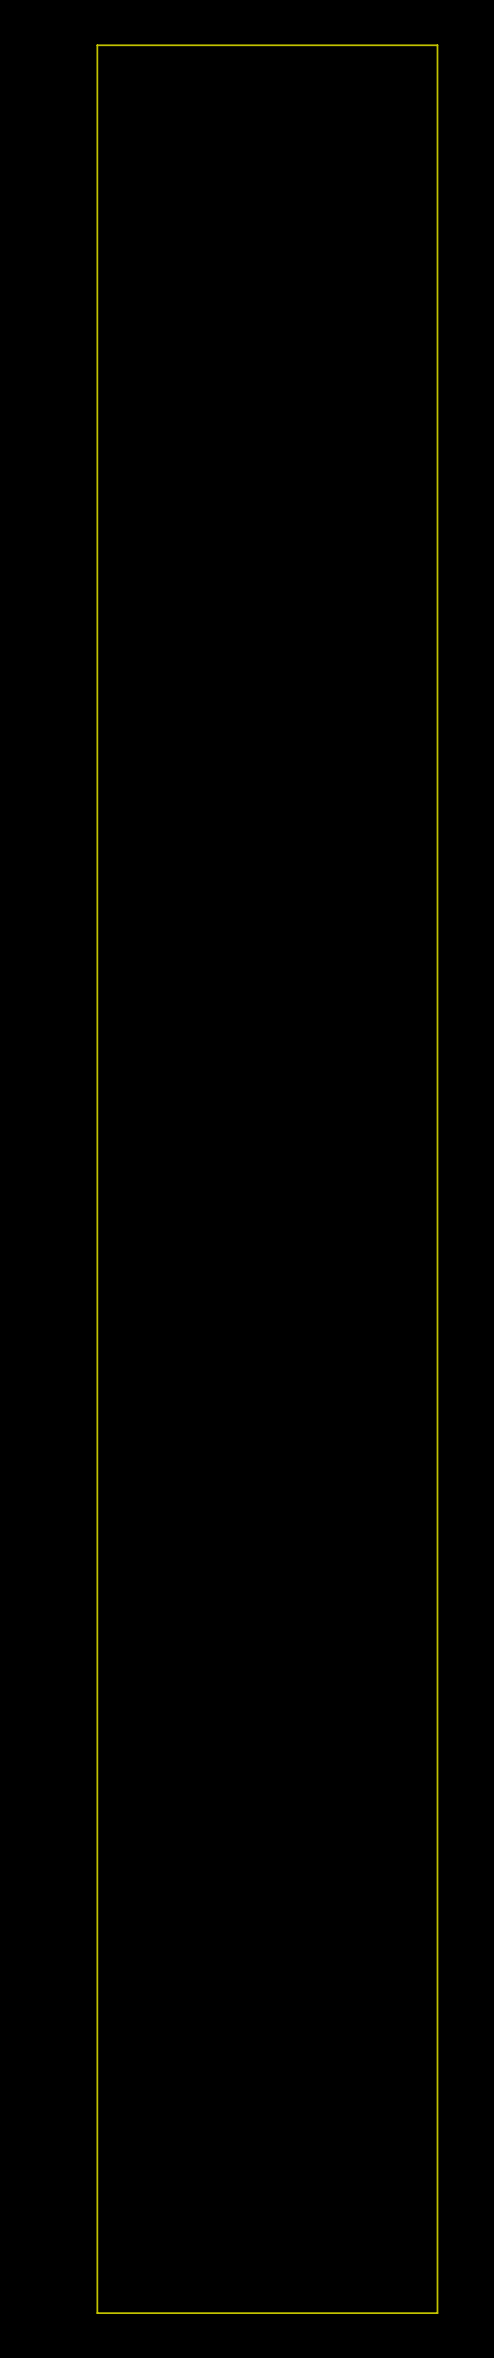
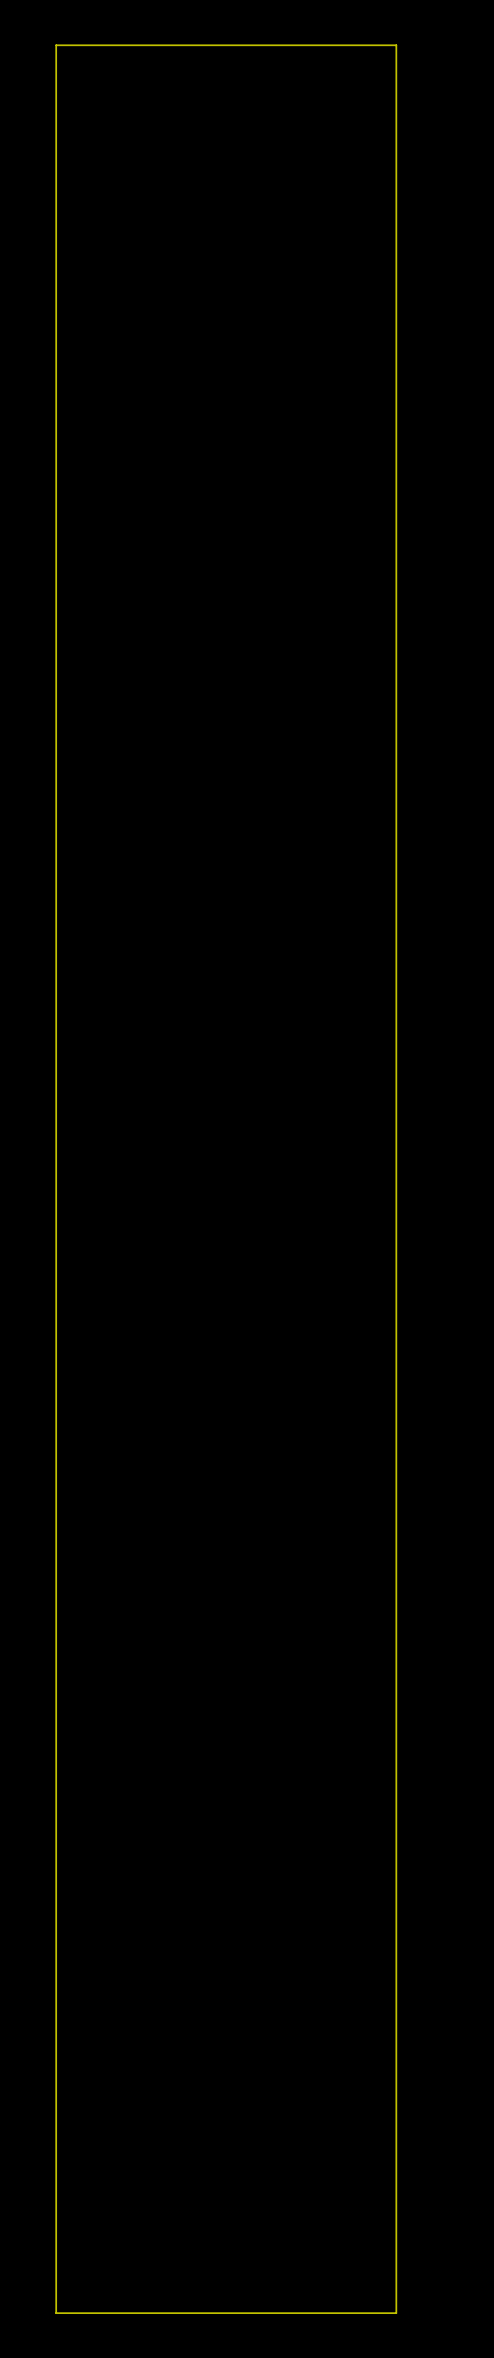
board edge: (97, 45) (97, 2313) -> (97, 45) (56, 45) (56, 2313) (97, 2313)
board edge: (396, 45) (437, 45) (437, 2313) (396, 2313) -> (396, 45) (396, 2313)

